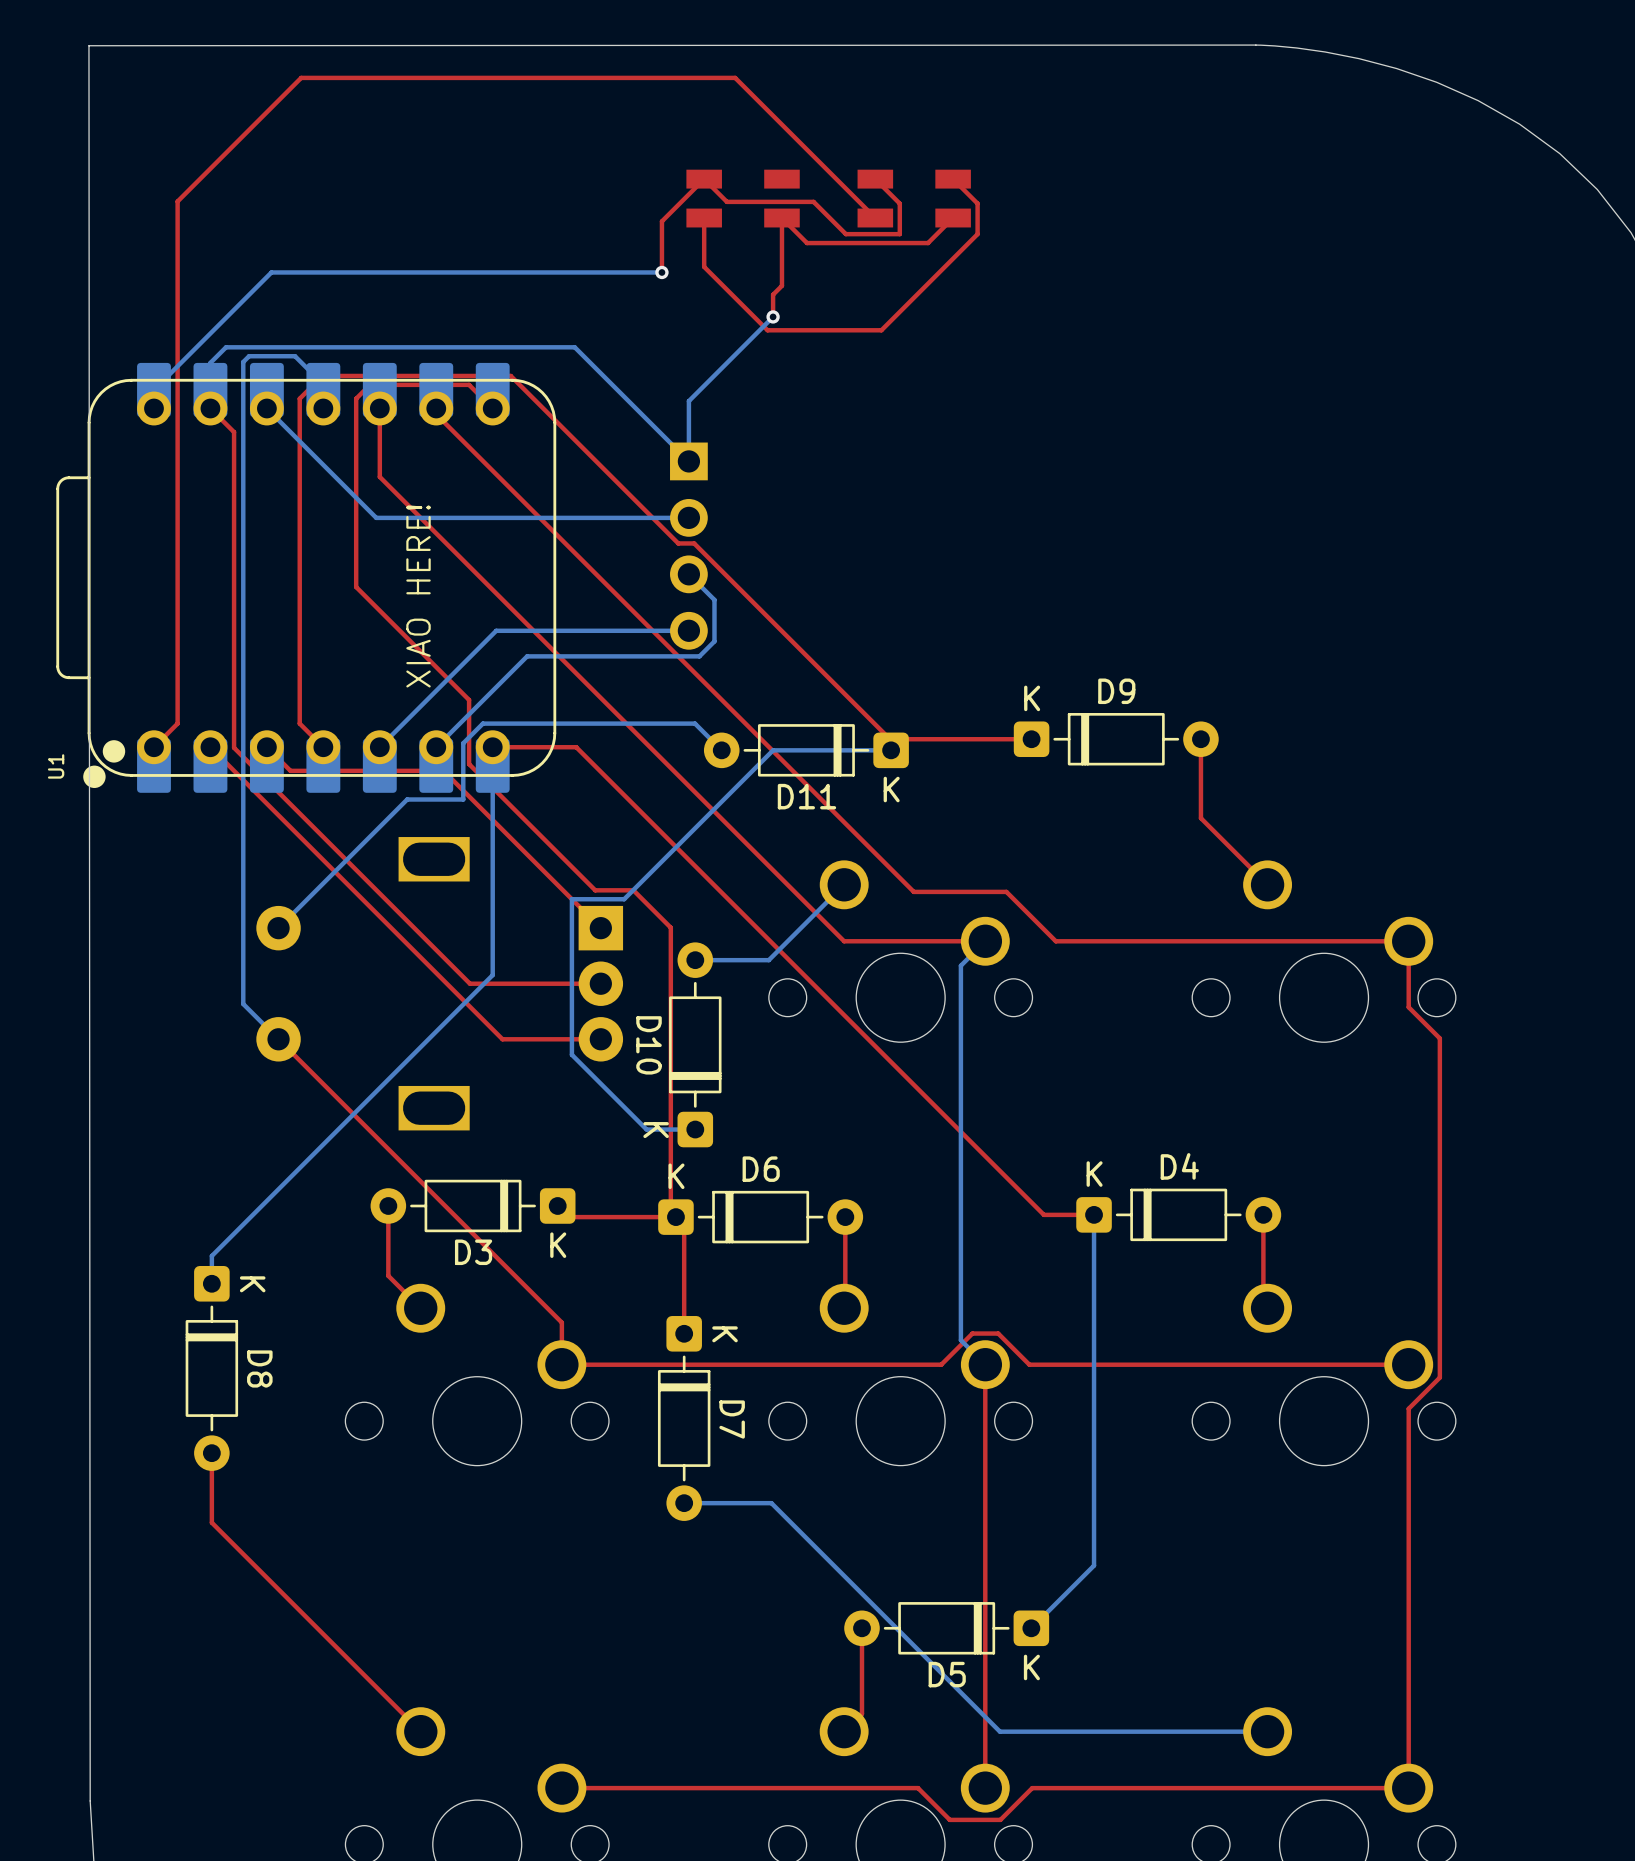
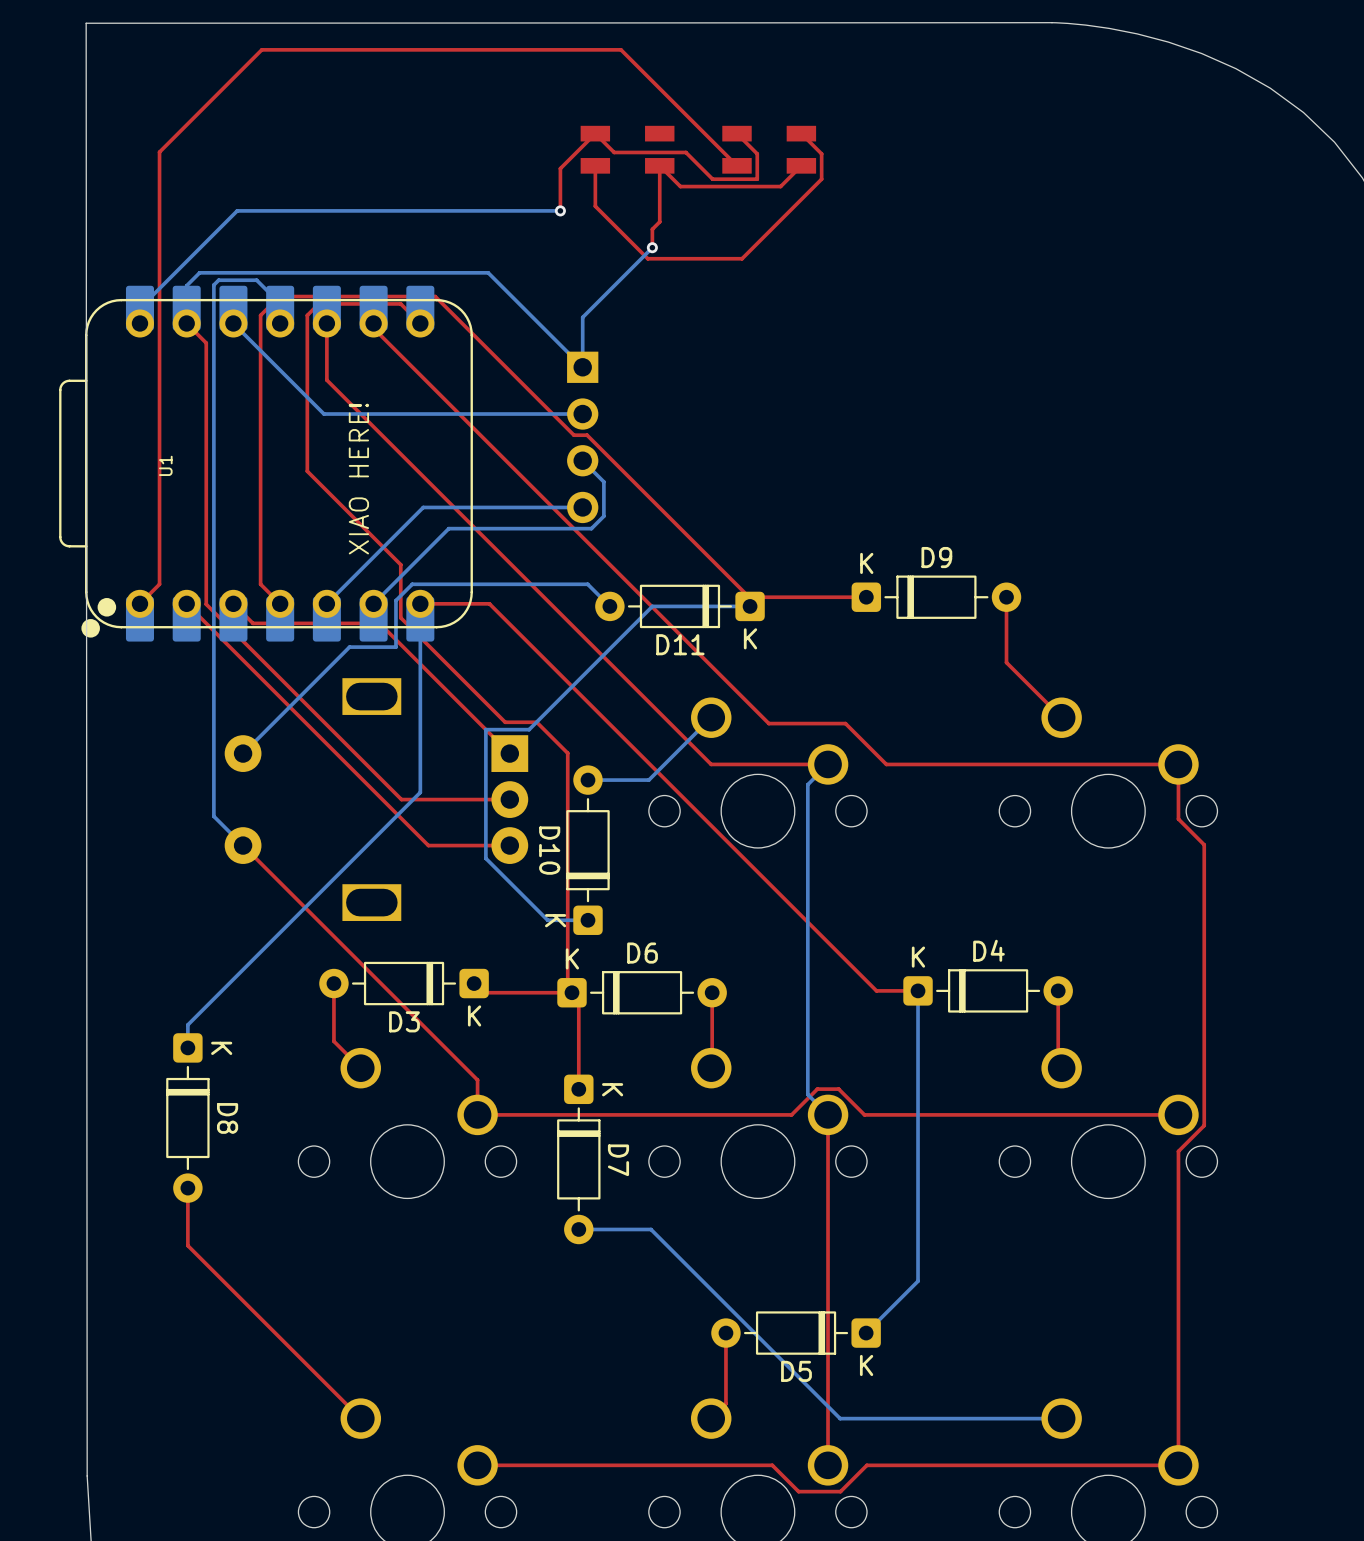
U1 name position: U1 (56, 766) -> U1 (165, 465)

